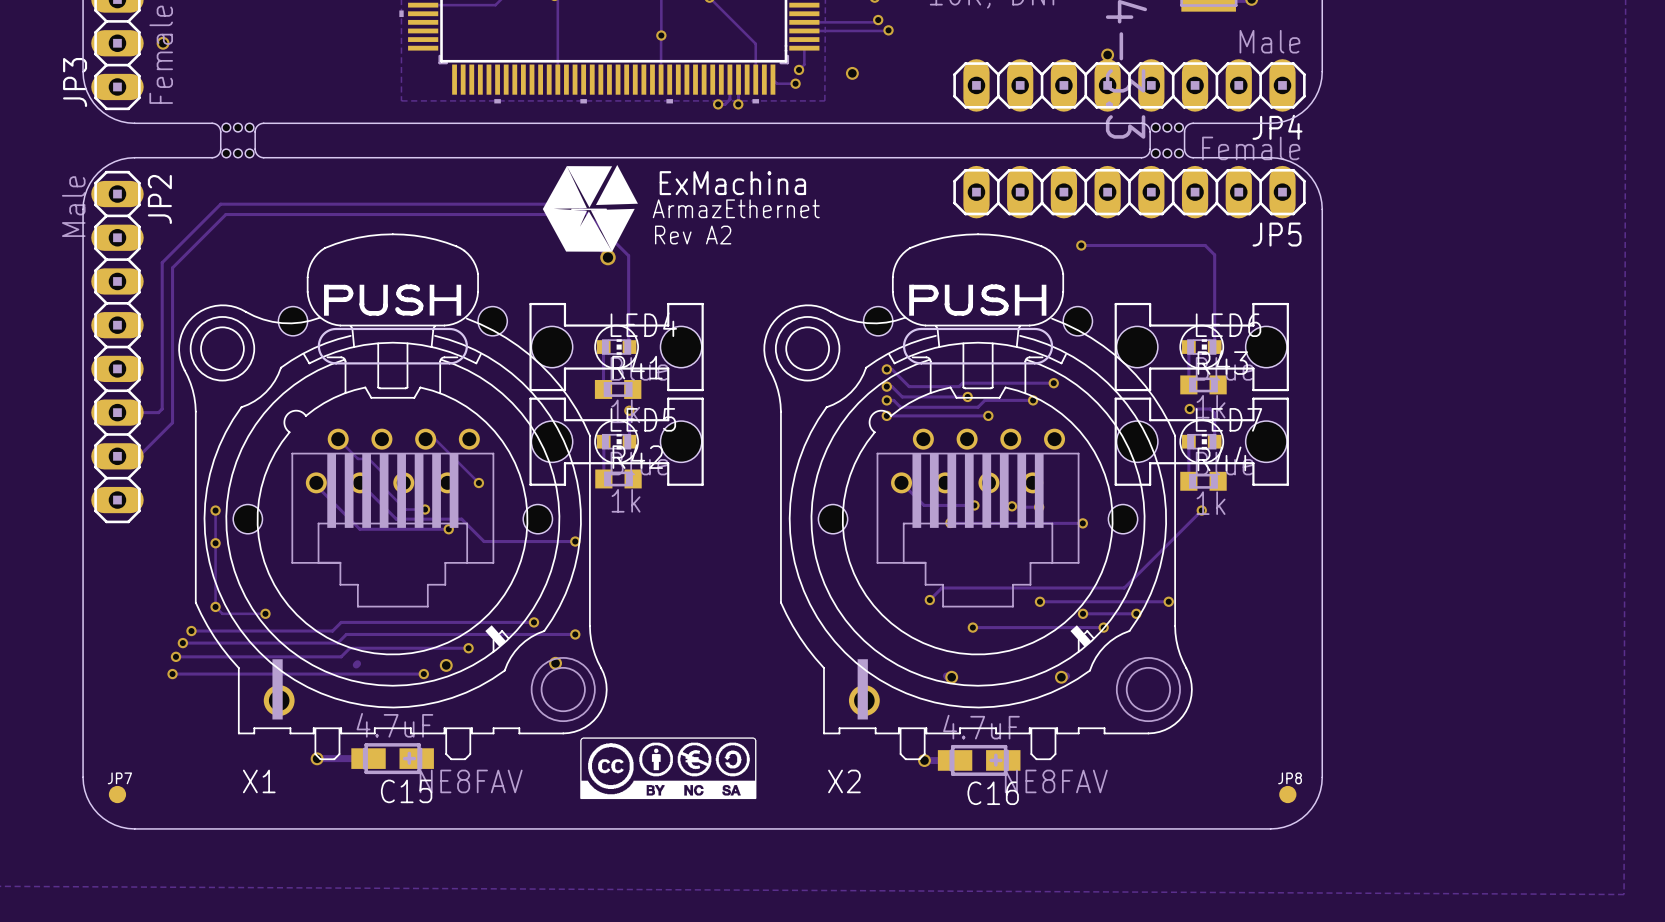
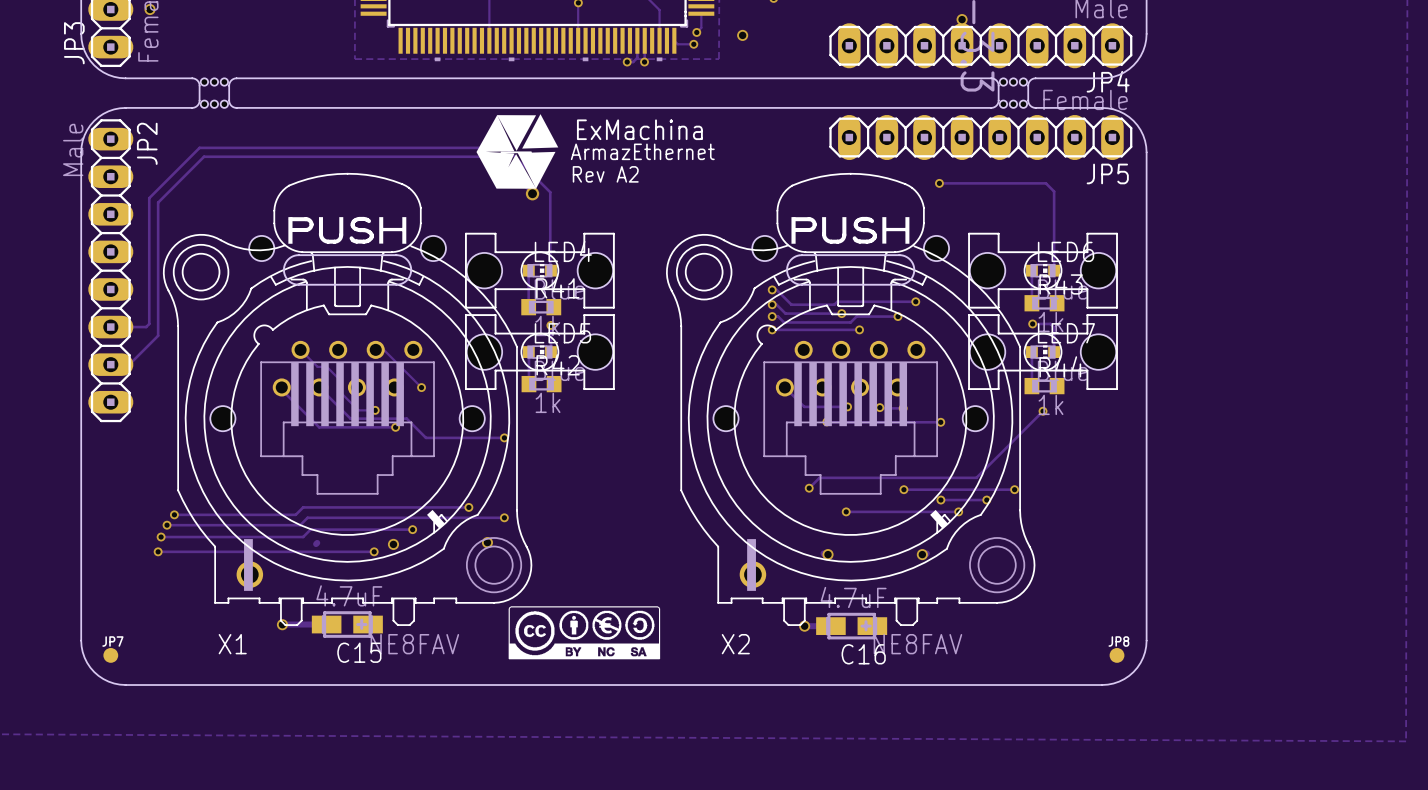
track: (215, 510) (215, 606) (222, 613) (265, 613) -> none
via: (215, 510) -> none
via: (215, 543) -> none
via: (215, 606) -> none
via: (265, 613) -> none

